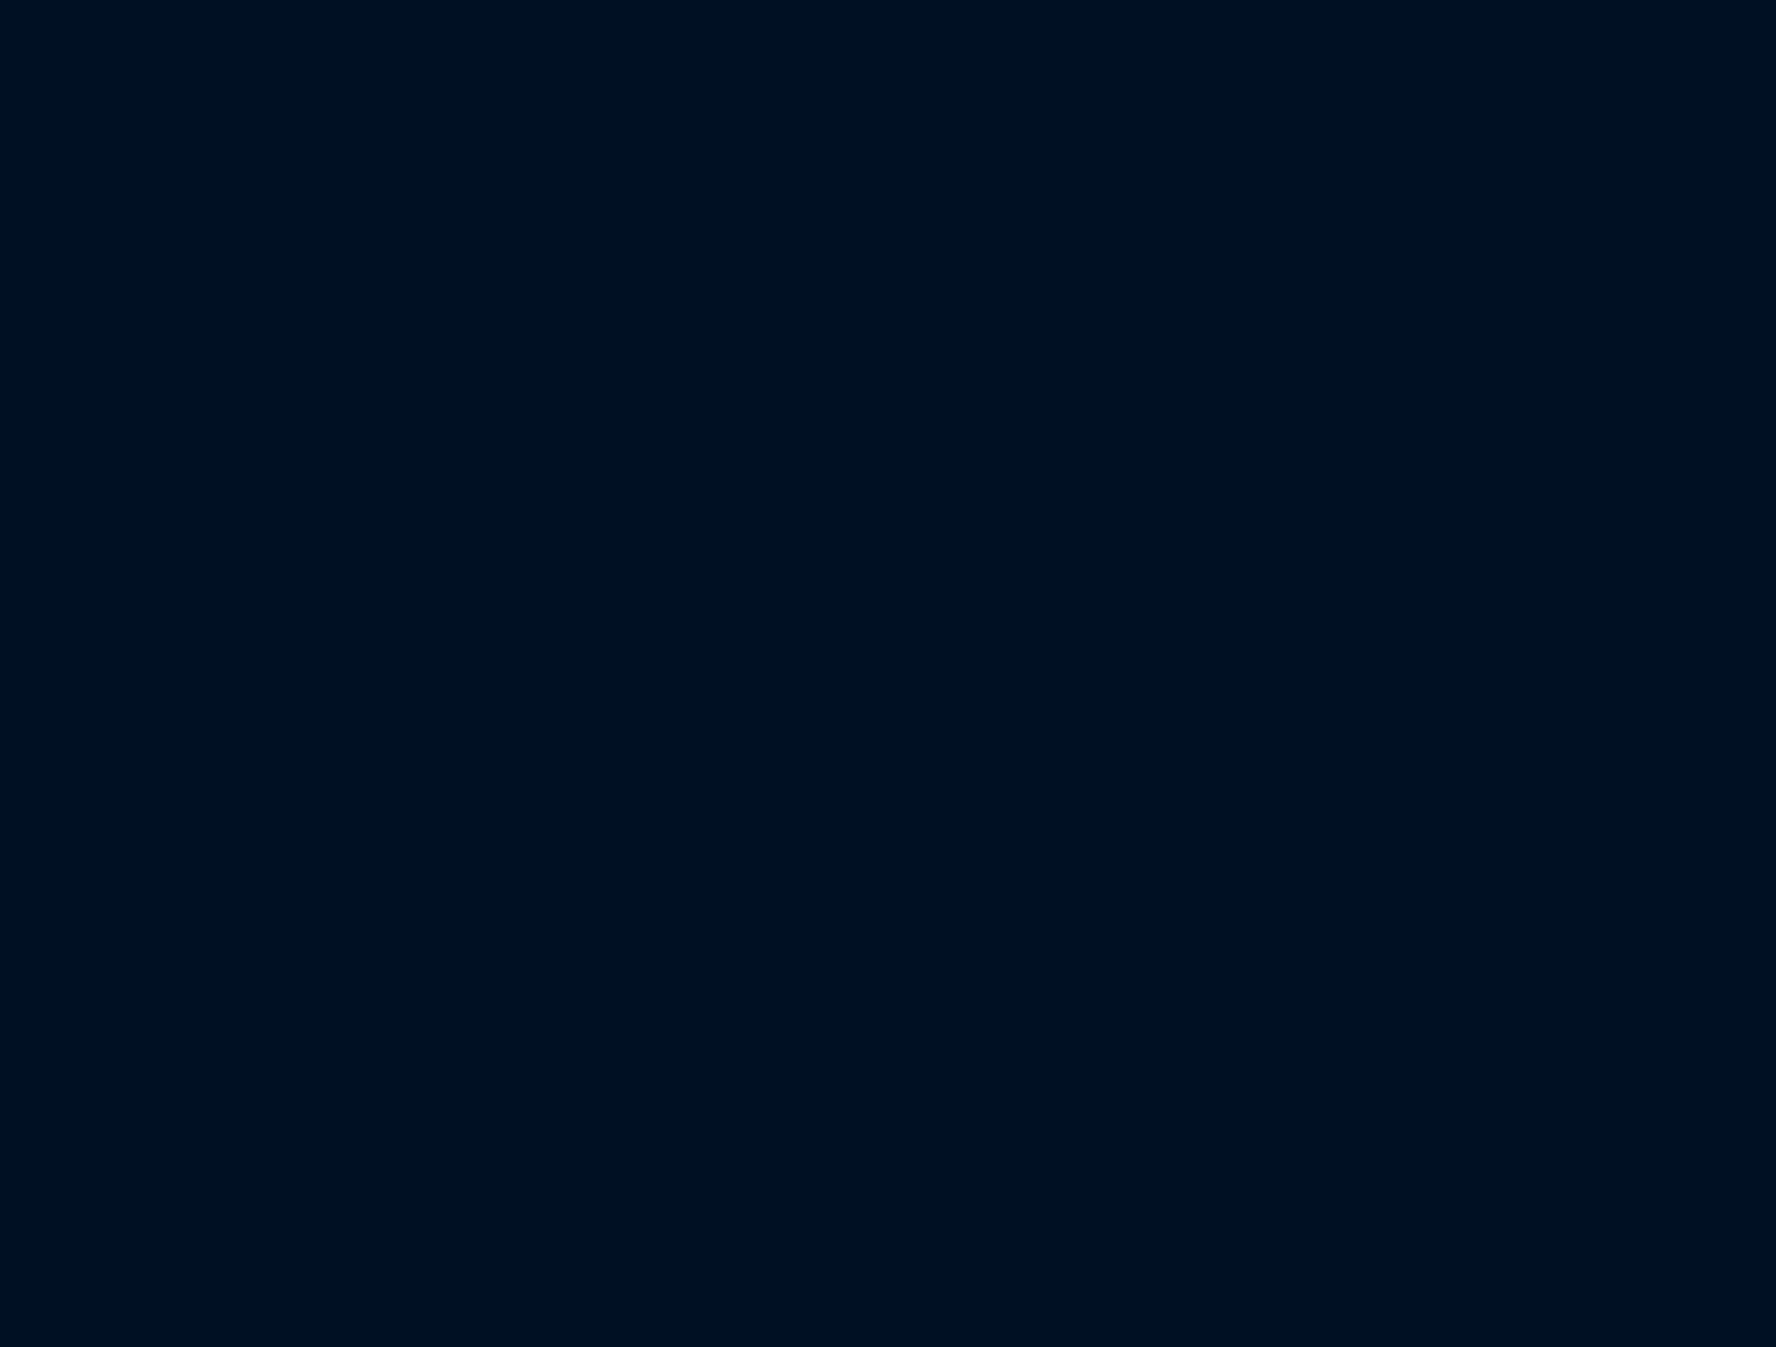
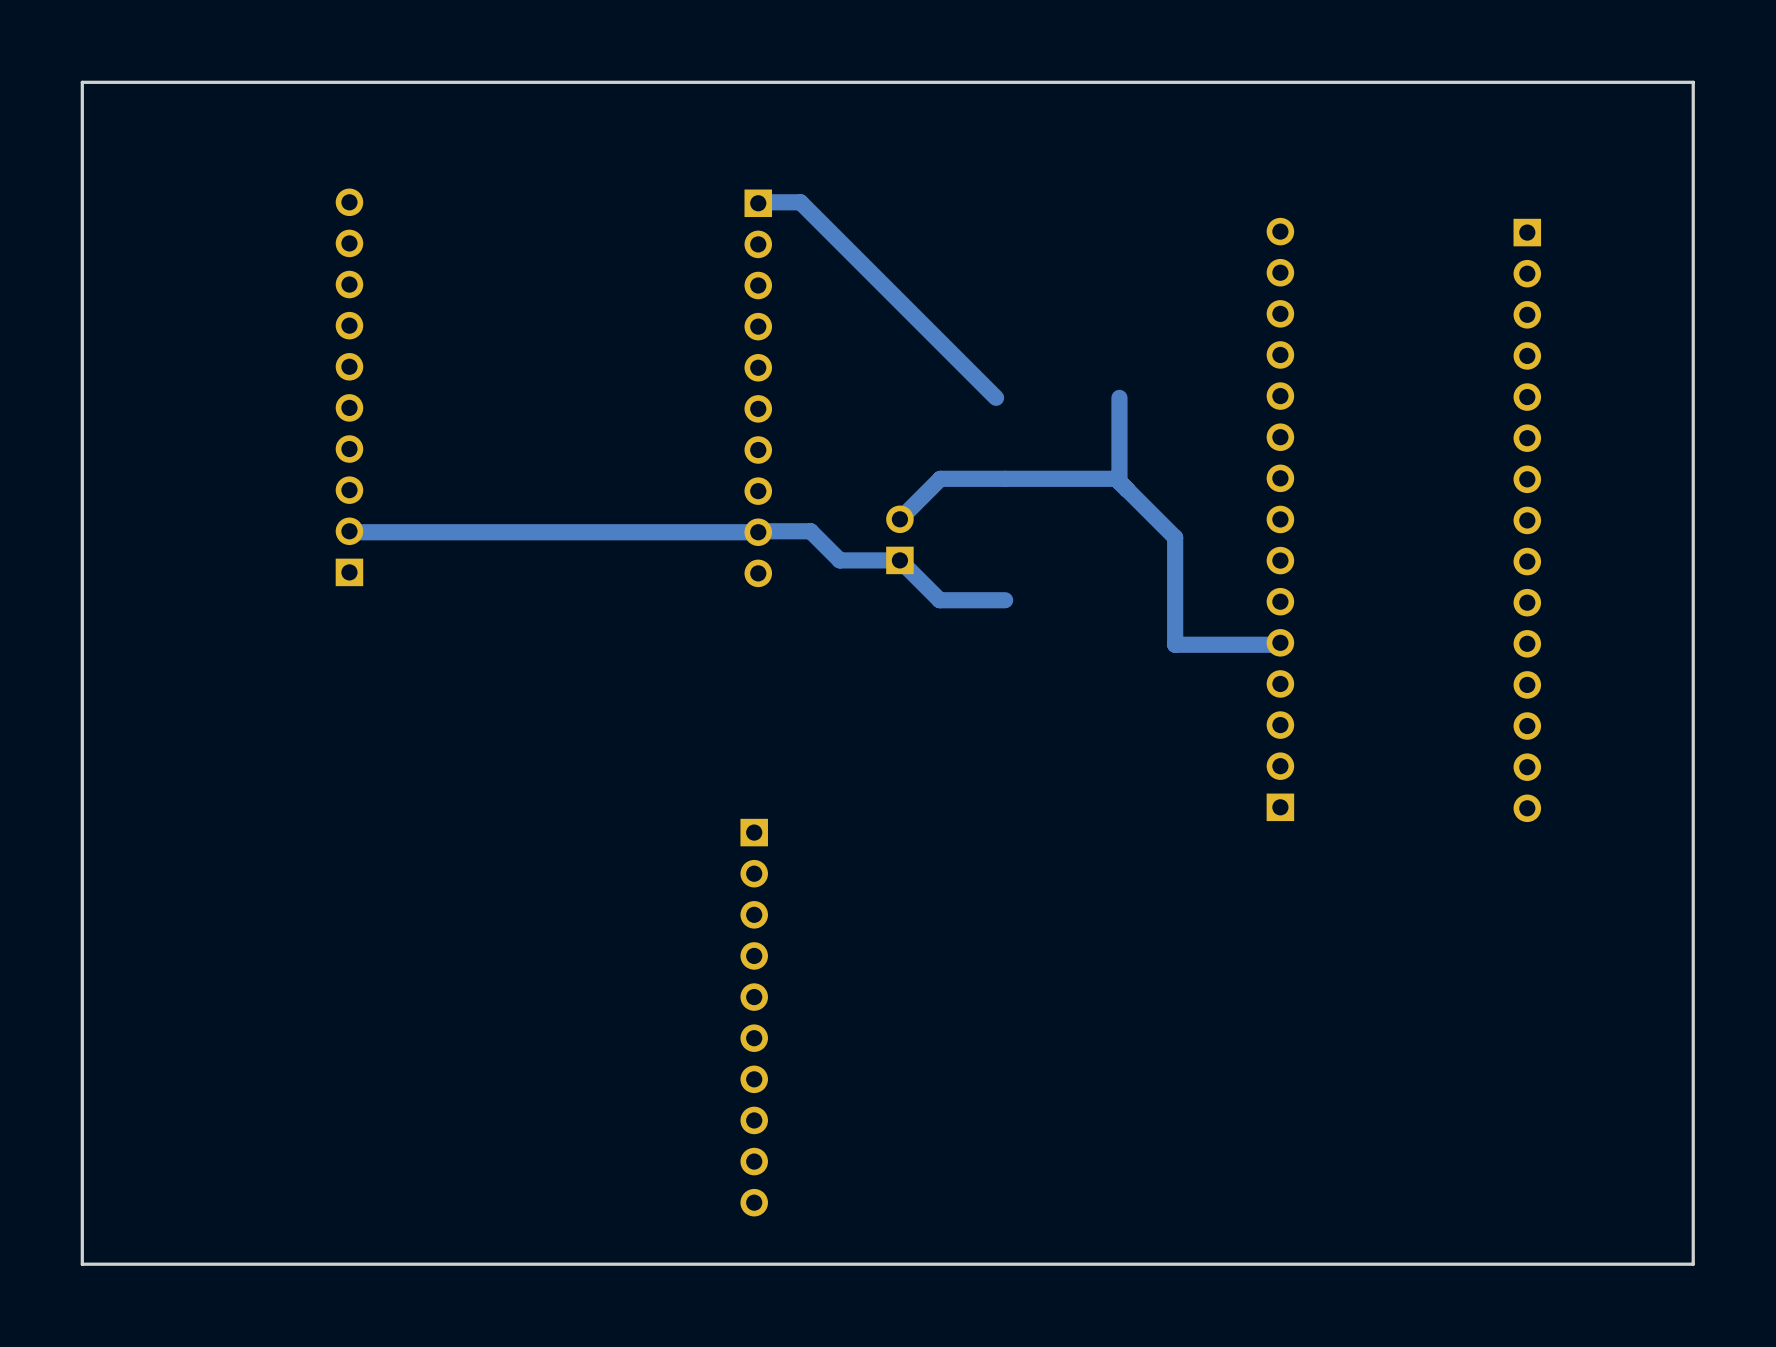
board edge: none -> (1693, 82) (82, 82) (82, 1264) (1693, 1264) (1693, 82)
bottom track: none -> (758, 202) (800, 202) (996, 397)
part: none -> (349, 387)
part: none -> (758, 388)
bottom track: none -> (1119, 397) (1119, 481)
bottom track: none -> (899, 519) (940, 478) (1116, 478) (1175, 537) (1175, 644) (1278, 644) (1280, 642)
part: none -> (1280, 519)
part: none -> (1527, 520)
bottom track: none -> (349, 531) (758, 532)
bottom track: none -> (758, 531) (810, 531) (839, 560) (899, 560) (939, 600) (1005, 600)
part: none -> (899, 539)
part: none -> (754, 1017)

